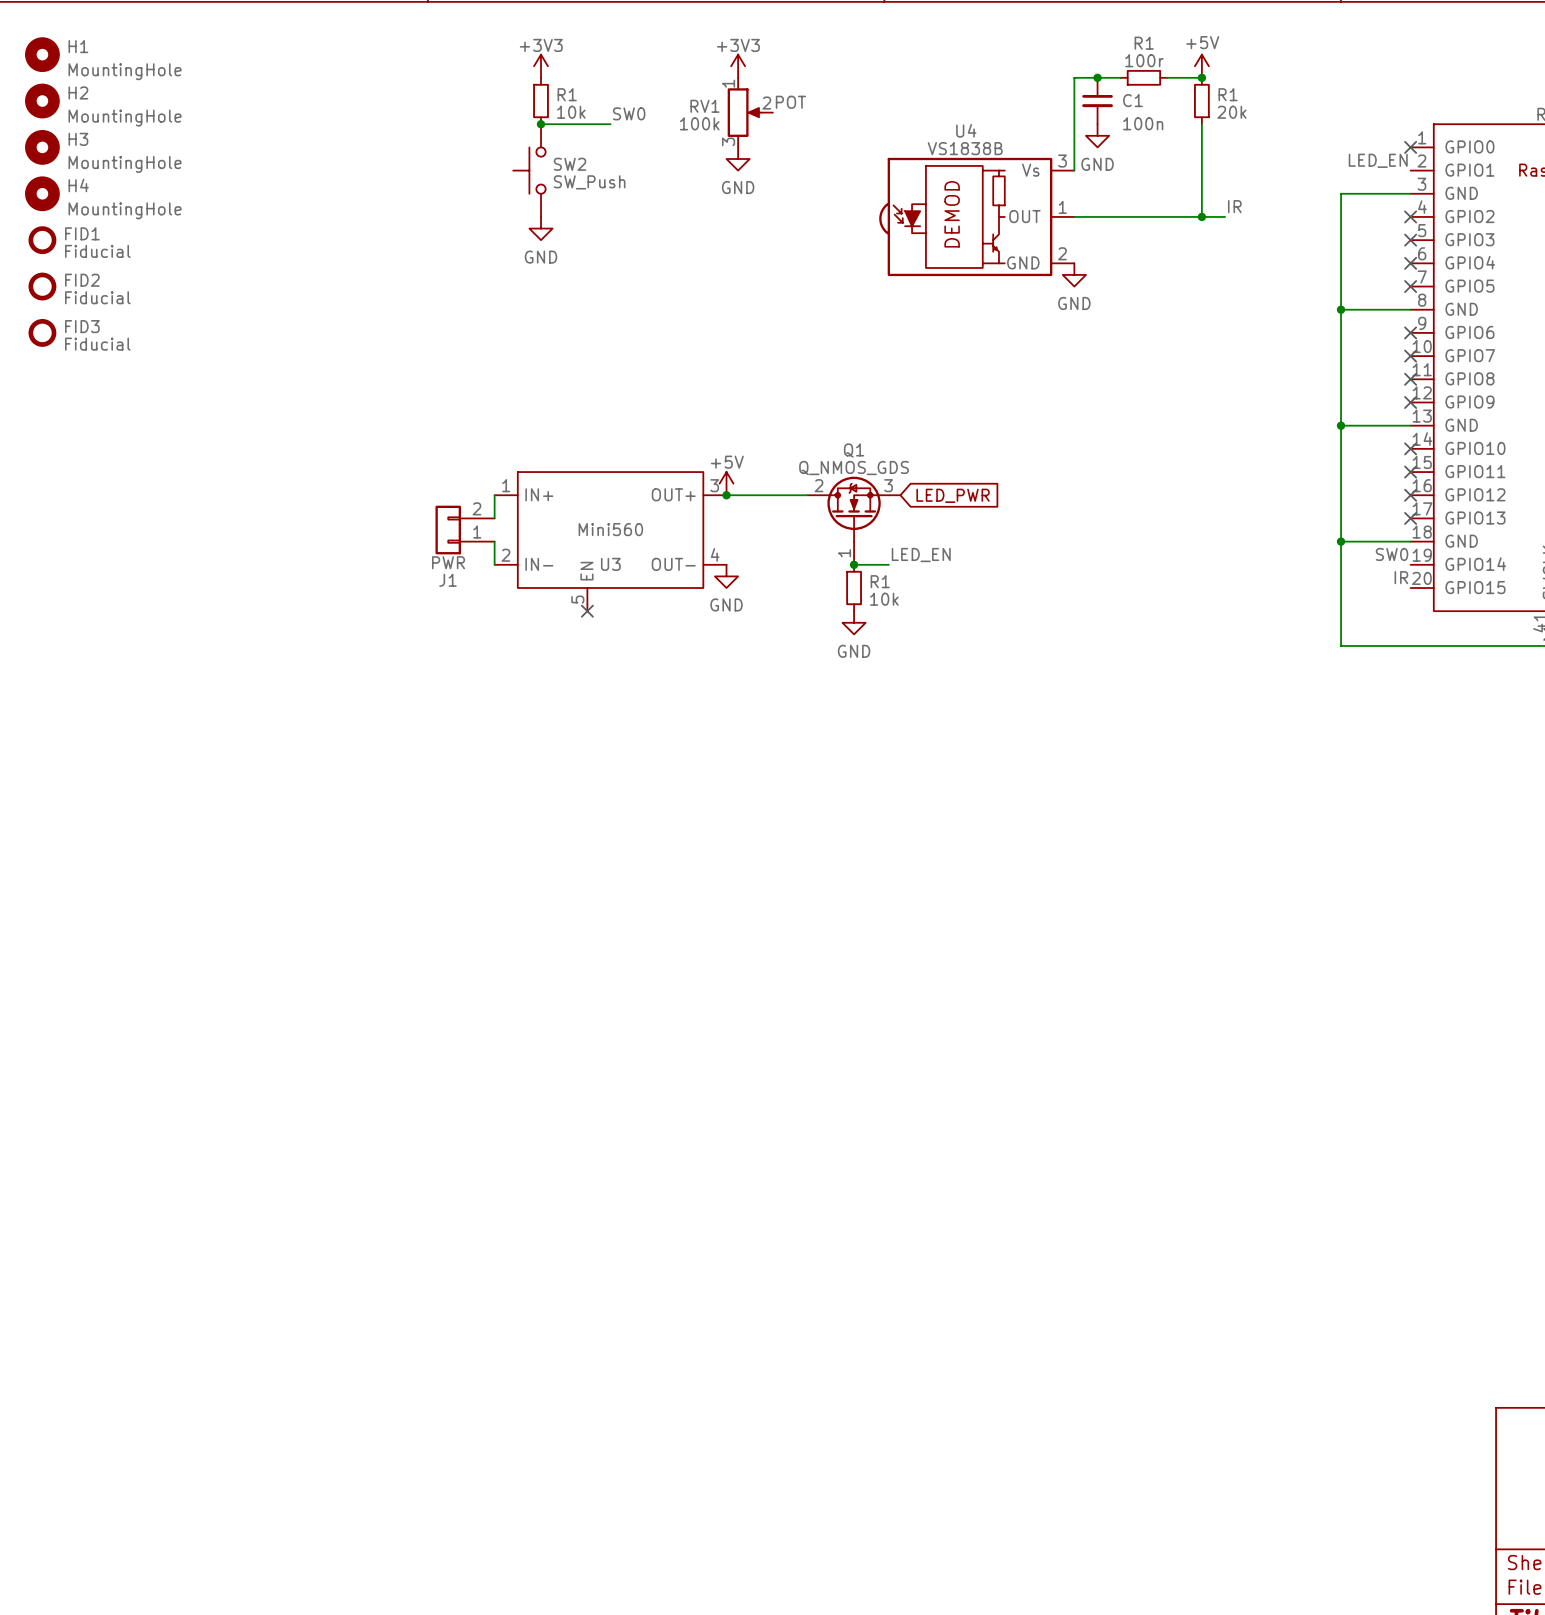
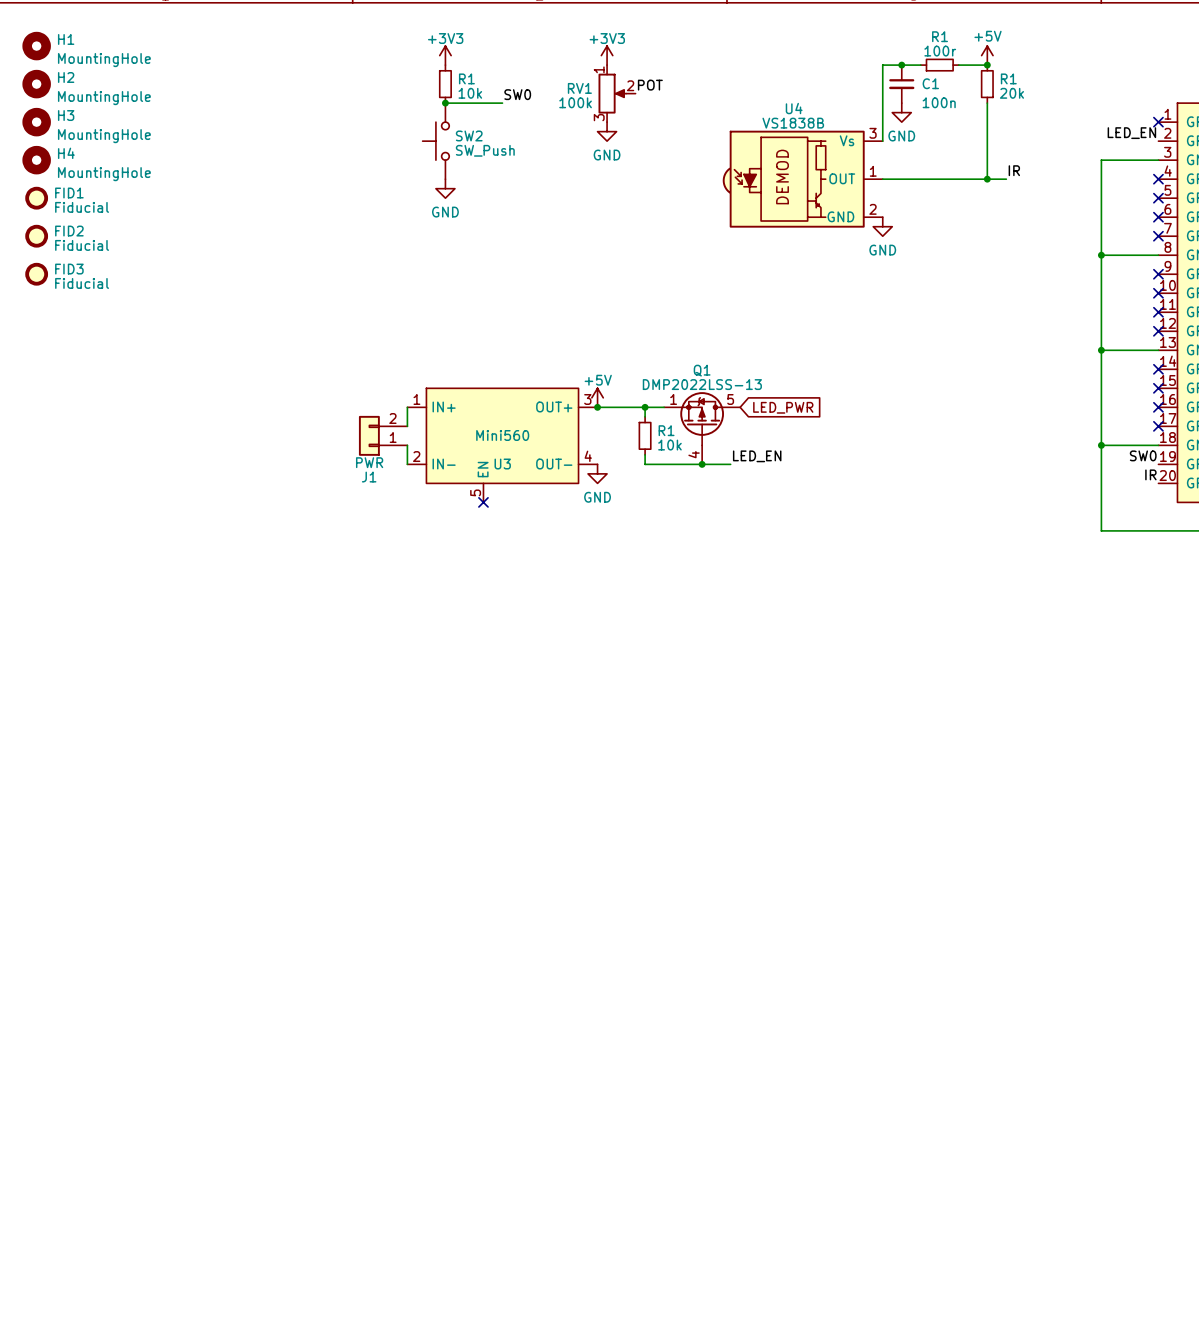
Q1 value: Q_NMOS_GDS (854, 468) -> DMP2022LSS-13 (702, 384)
Q1 symbol: [807, 476, 901, 565] -> [664, 392, 741, 465]
wire: none -> (645, 407) (645, 416)
junction: none -> (645, 407)
wire: none -> (645, 454) (645, 464) (702, 464)
R1 position: (854, 588) -> (645, 435)
power symbol: GND (854, 622) -> none

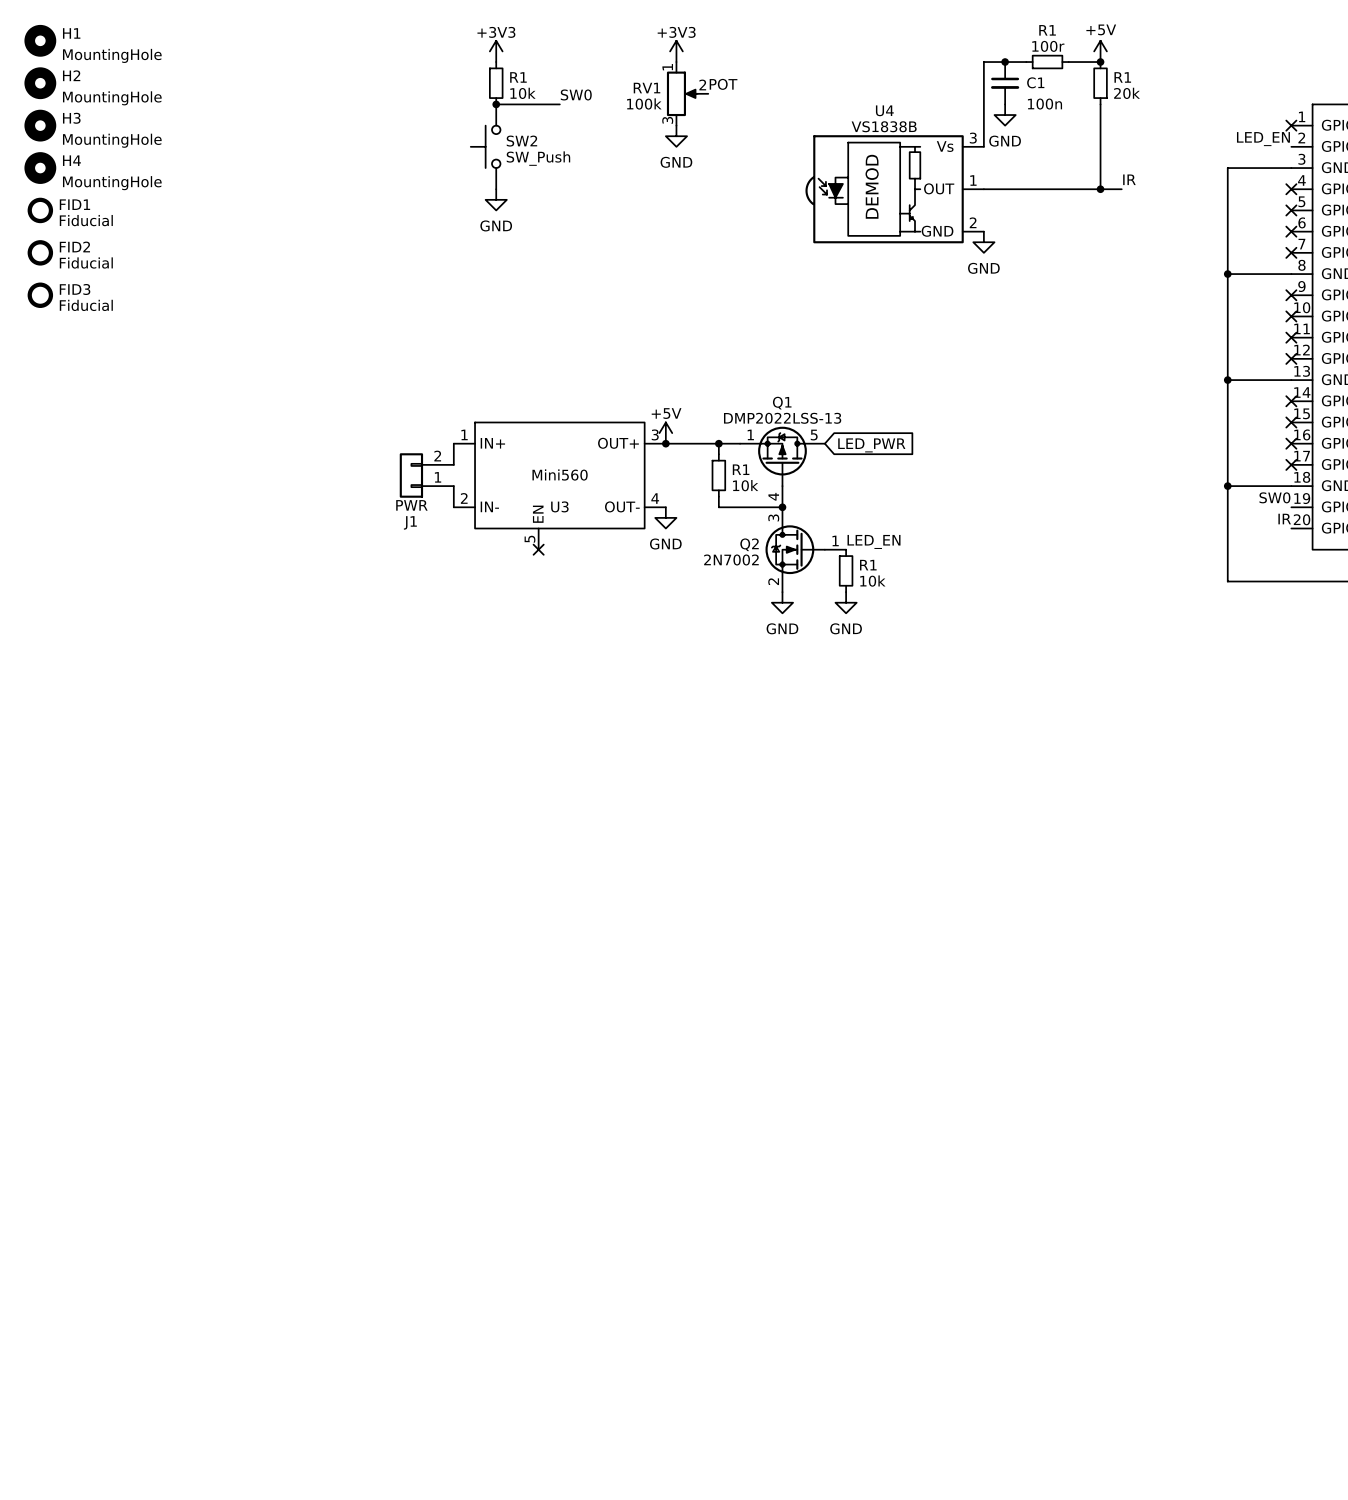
label position: LED_EN (757, 456) -> LED_EN (874, 541)
wire: (702, 464) (730, 464) -> none
Q2: none -> 2N7002 (805, 549)
R1: none -> 10k (846, 570)
power symbol: none -> GND (782, 602)
power symbol: none -> GND (846, 602)

